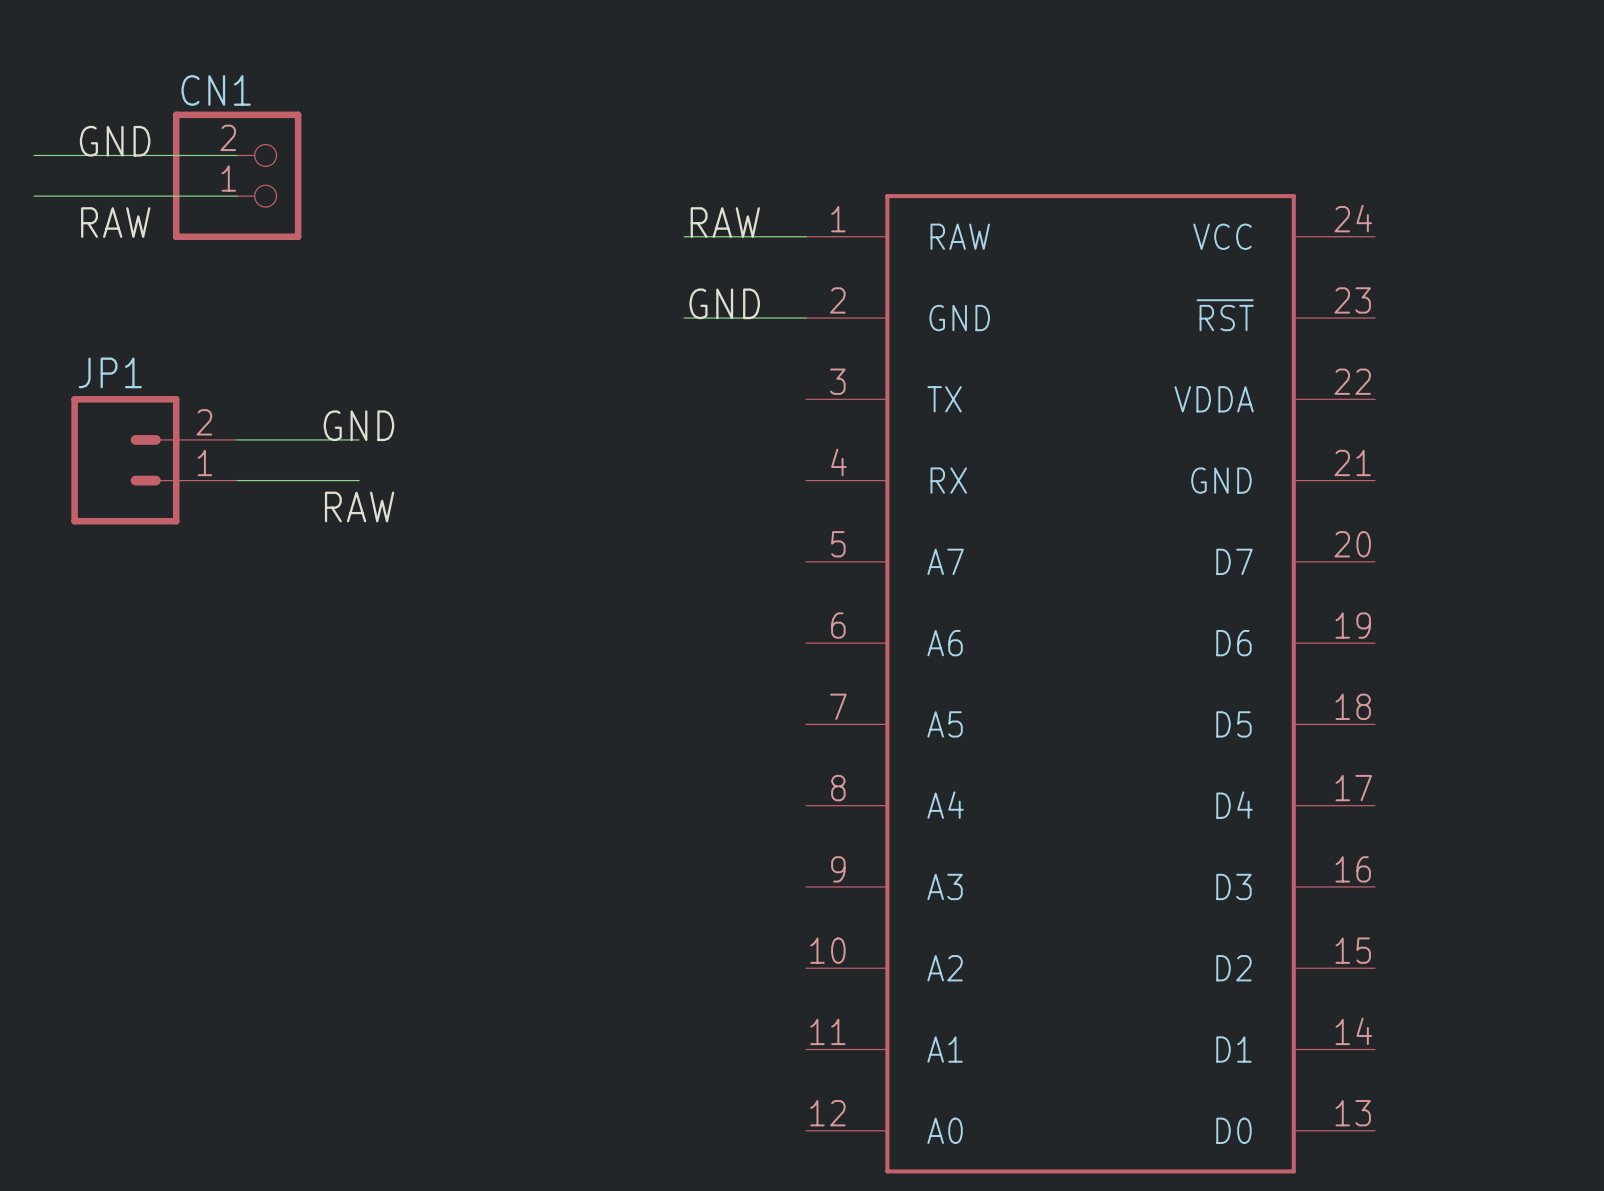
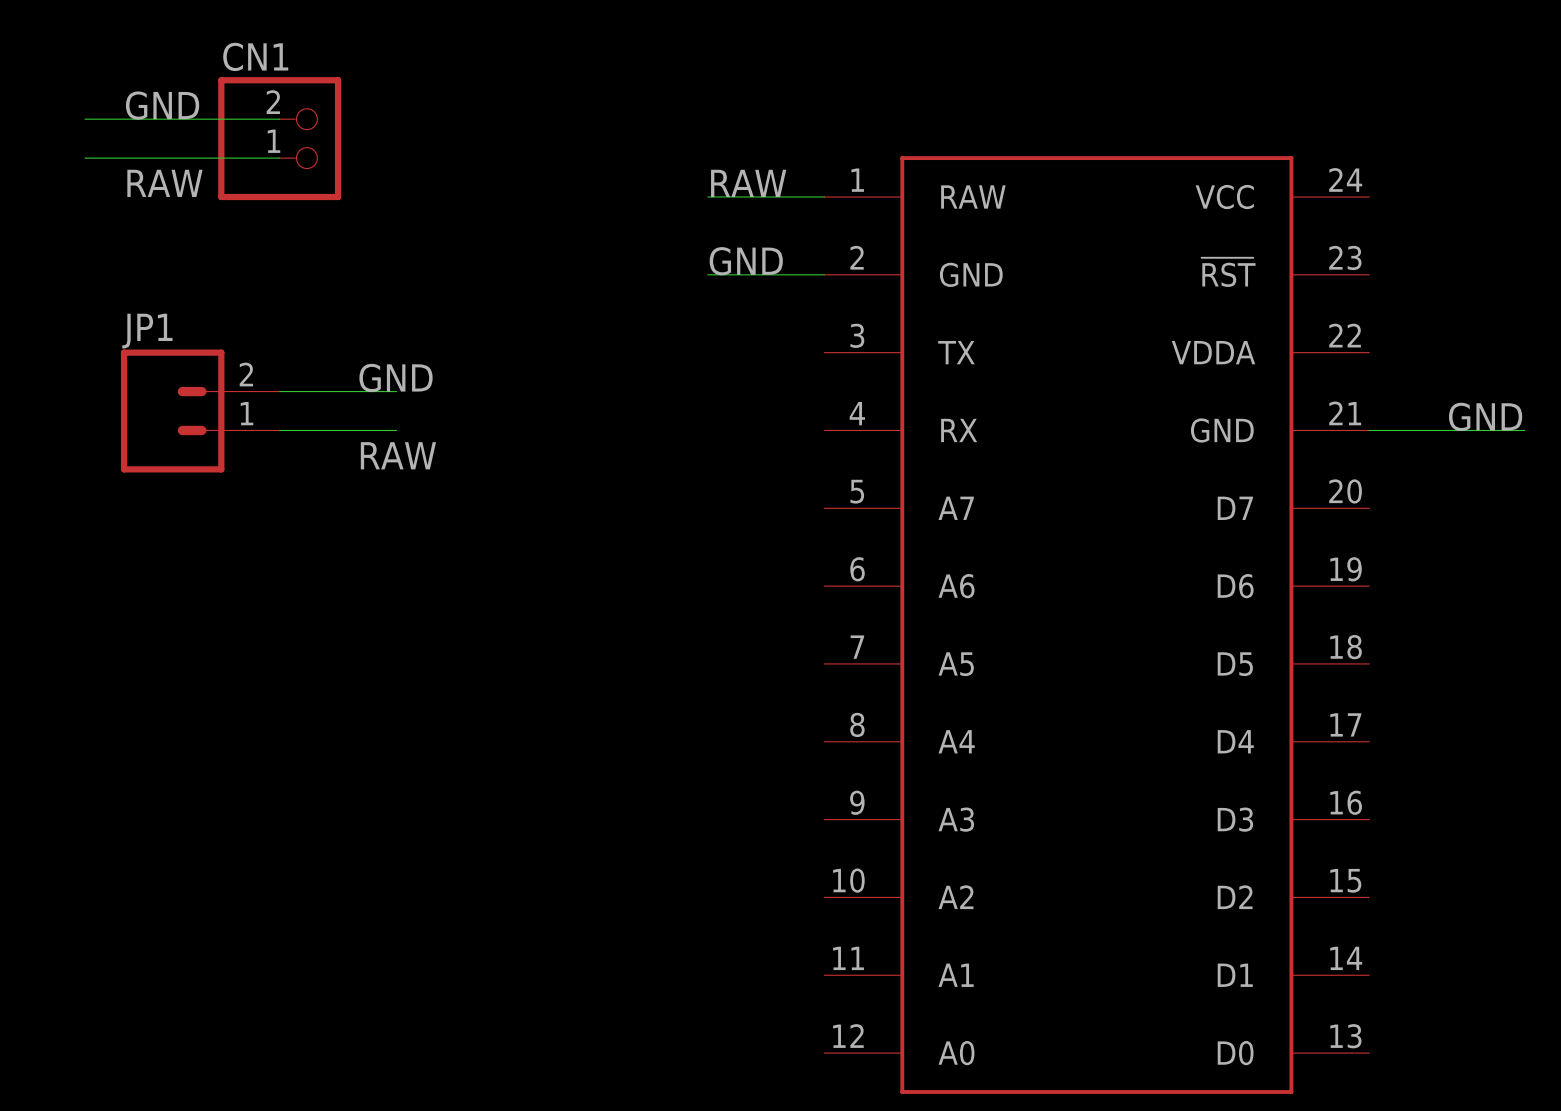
label: none -> GND (1485, 416)
wire: none -> (1369, 430) (1524, 430)

